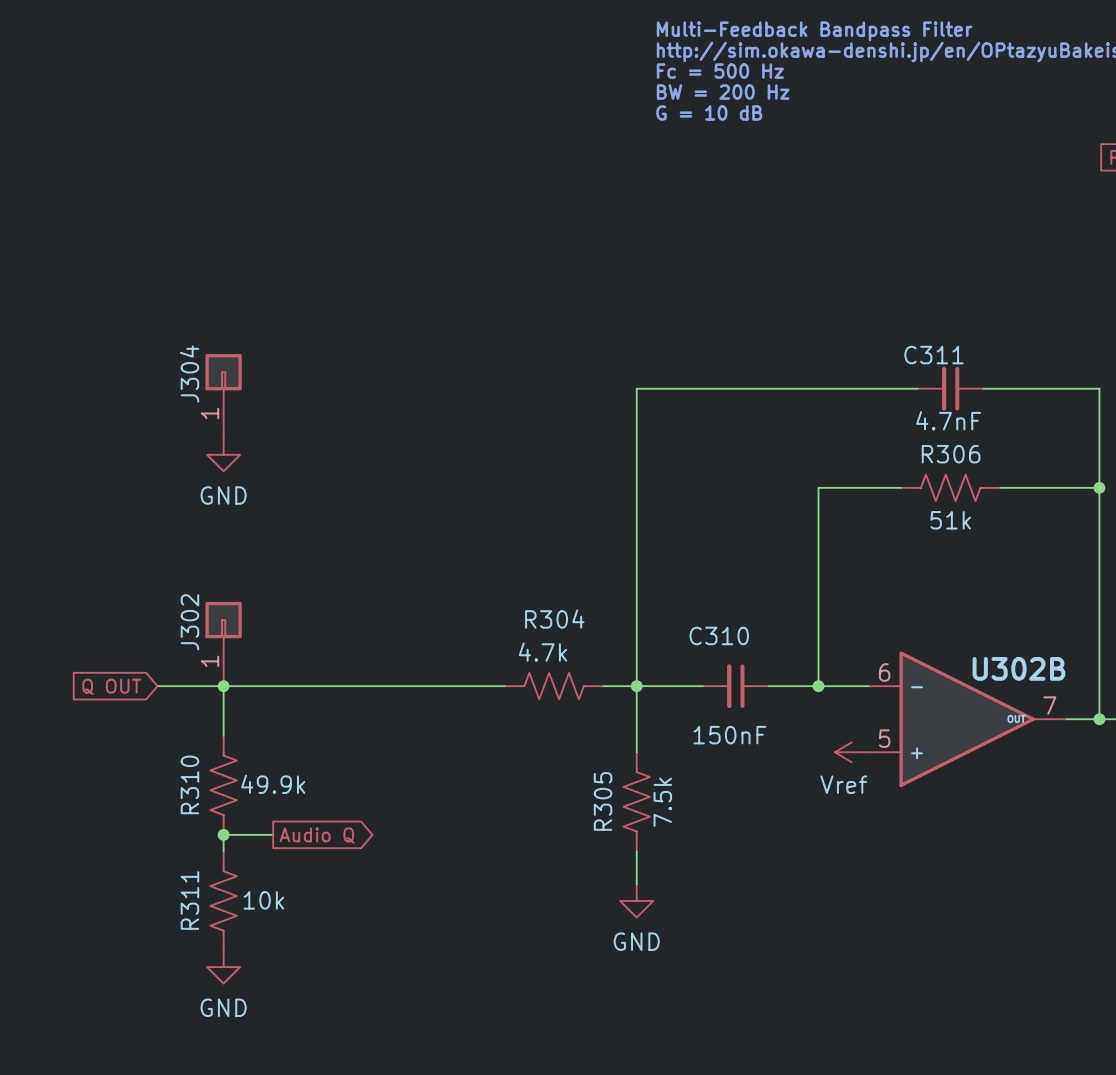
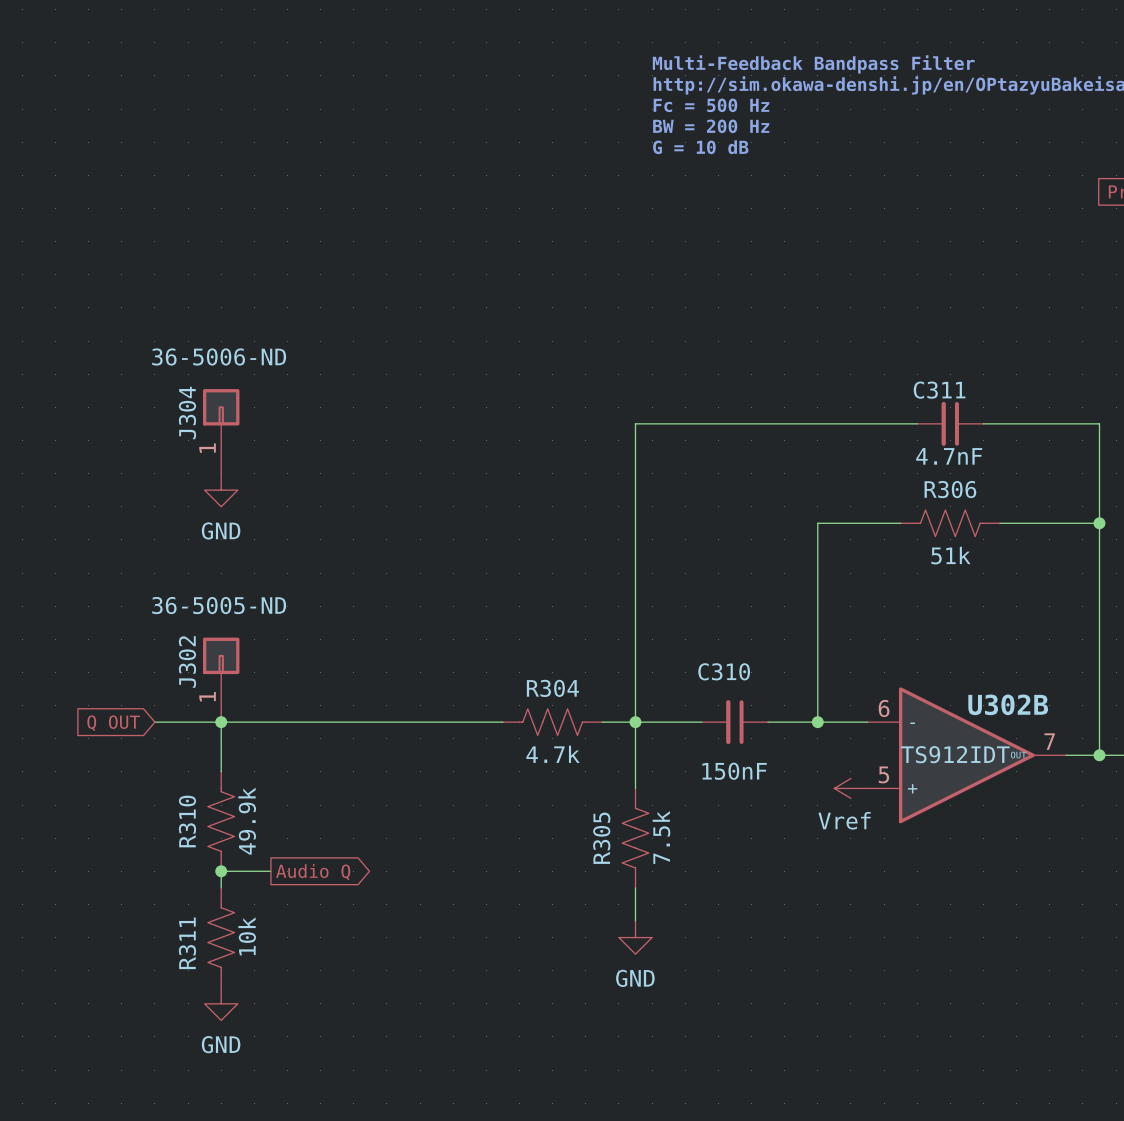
J304 value: none -> 36-5006-ND (219, 356)
J302 value: none -> 36-5005-ND (219, 605)
R304 name position: R304 (554, 619) -> R304 (552, 688)
R304 value position: 4.7k (542, 652) -> 4.7k (553, 754)
U302B value: none -> TS912IDT (955, 754)
R310 value rotation: 0° (273, 784) -> 90° counterclockwise (247, 821)
R311 value rotation: 0° (263, 900) -> 90° counterclockwise (247, 936)

